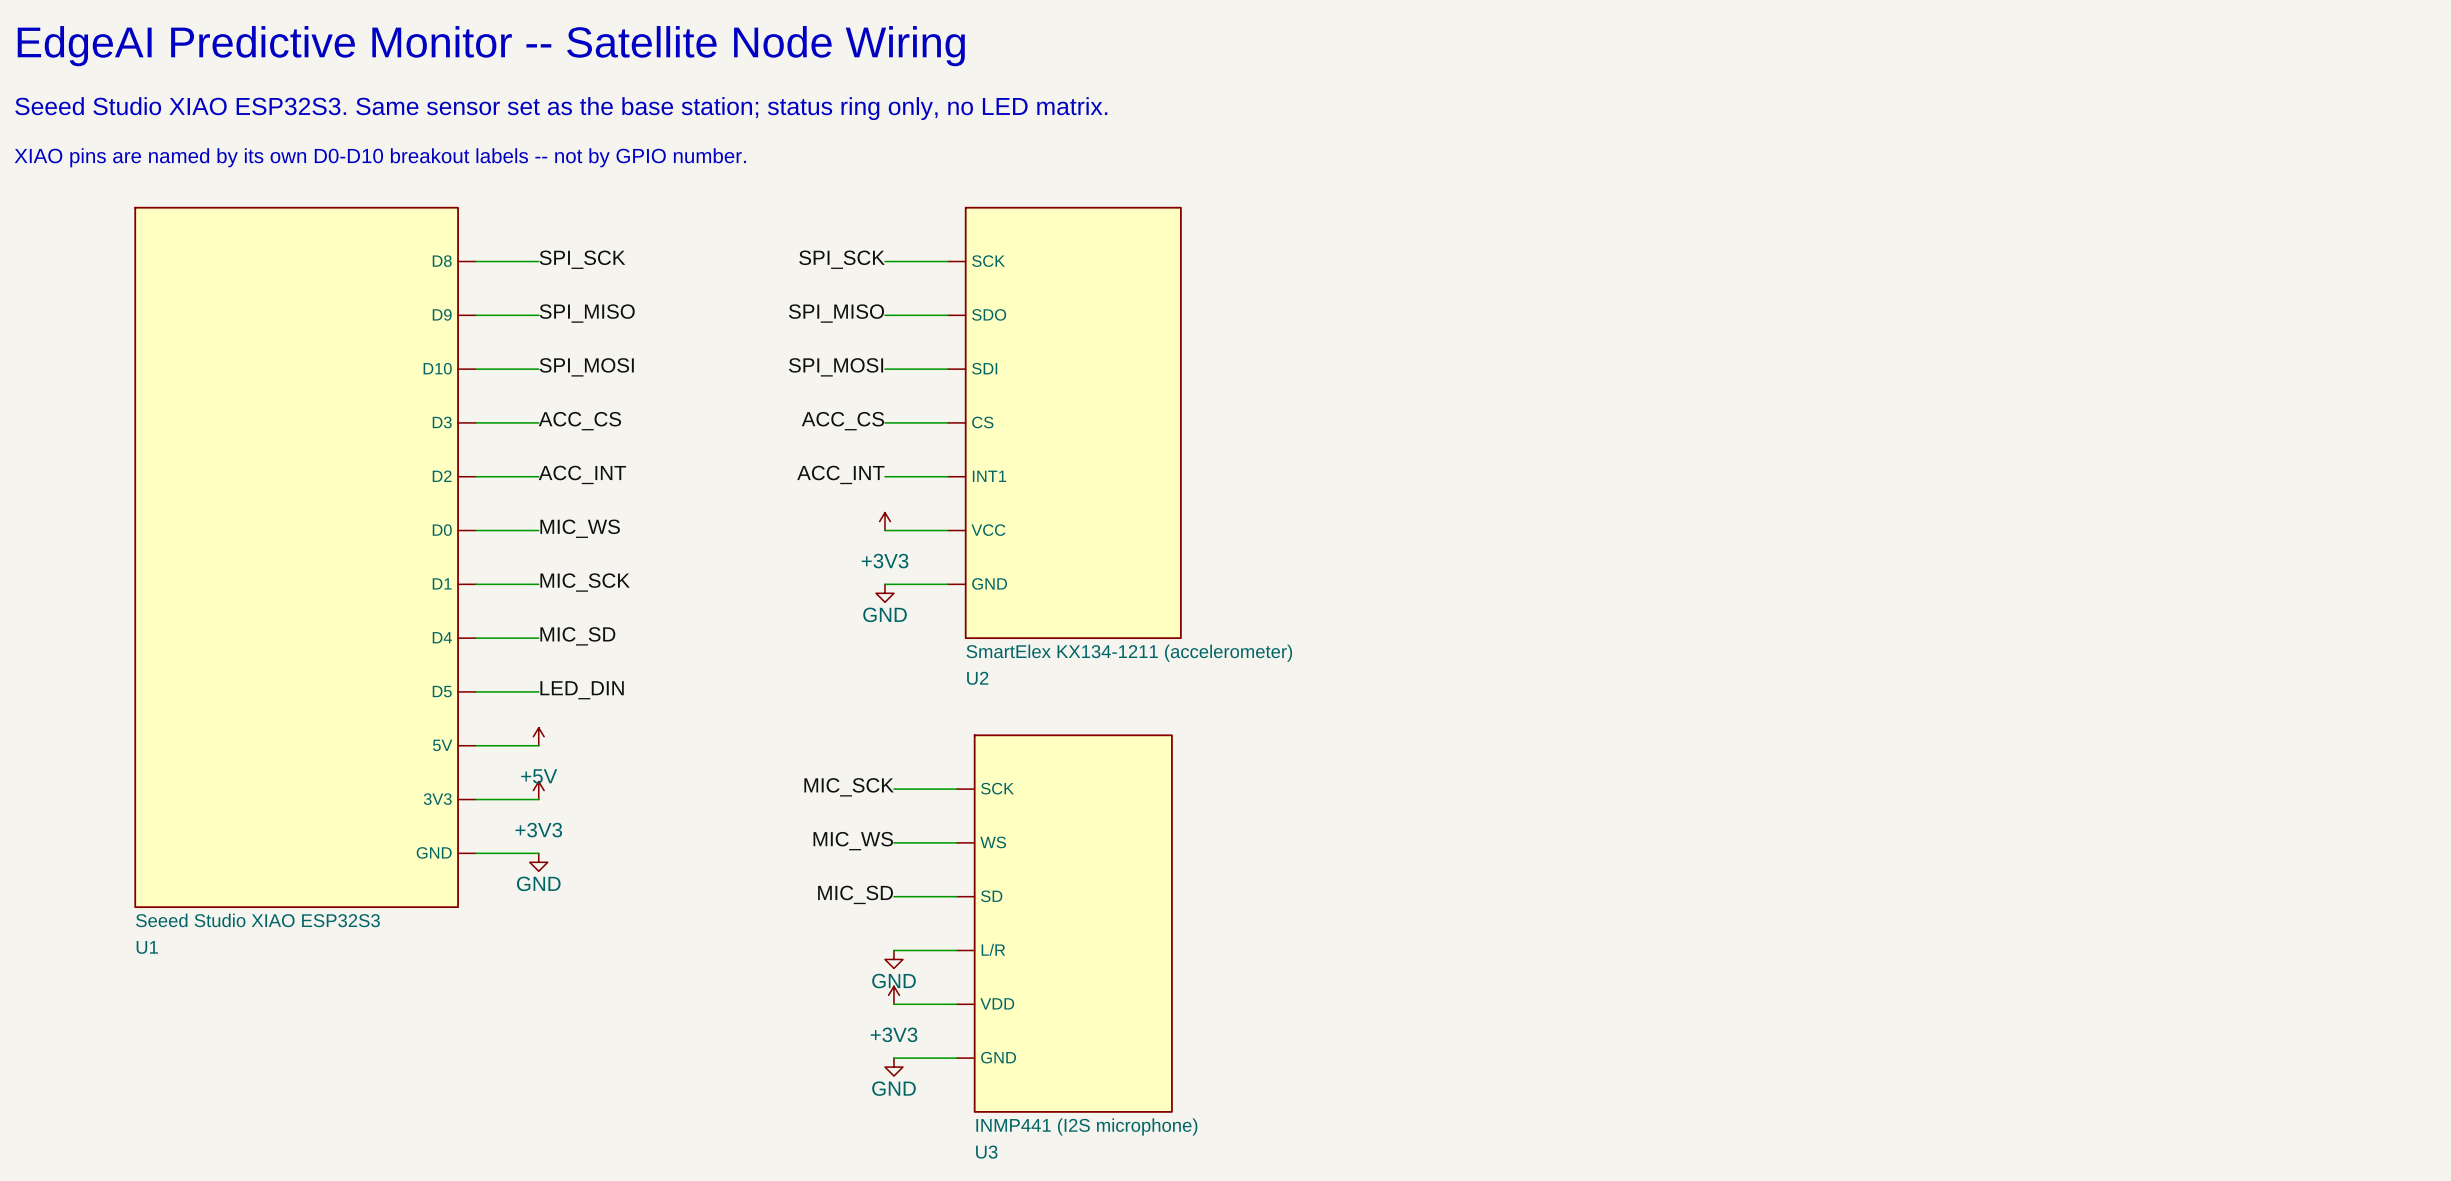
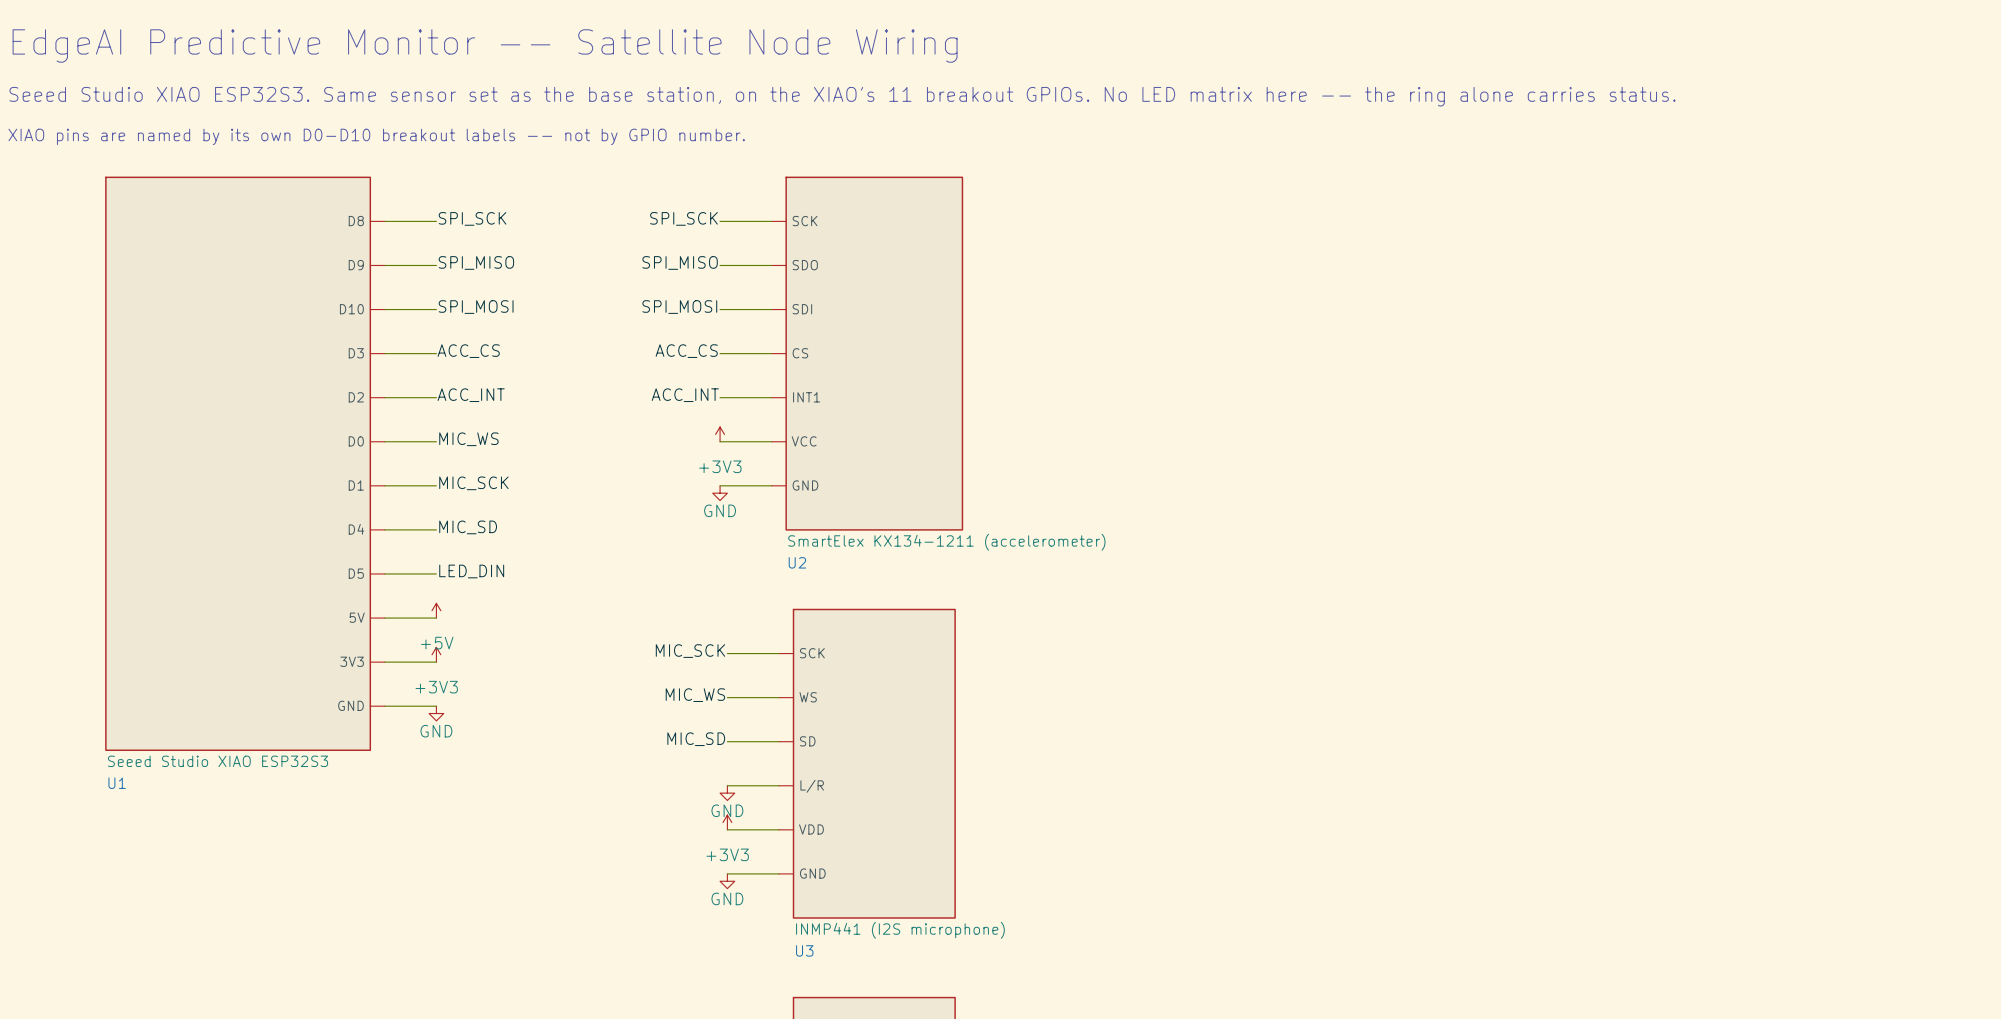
text: Seeed Studio XIAO ESP32S3. Same sensor set as the base station; status ring only, no LED matrix. (561, 108) -> Seeed Studio XIAO ESP32S3. Same sensor set as the base station, on the XIAO's 11 breakout GPIOs. No LED matrix here -- the ring alone carries status. (842, 96)

